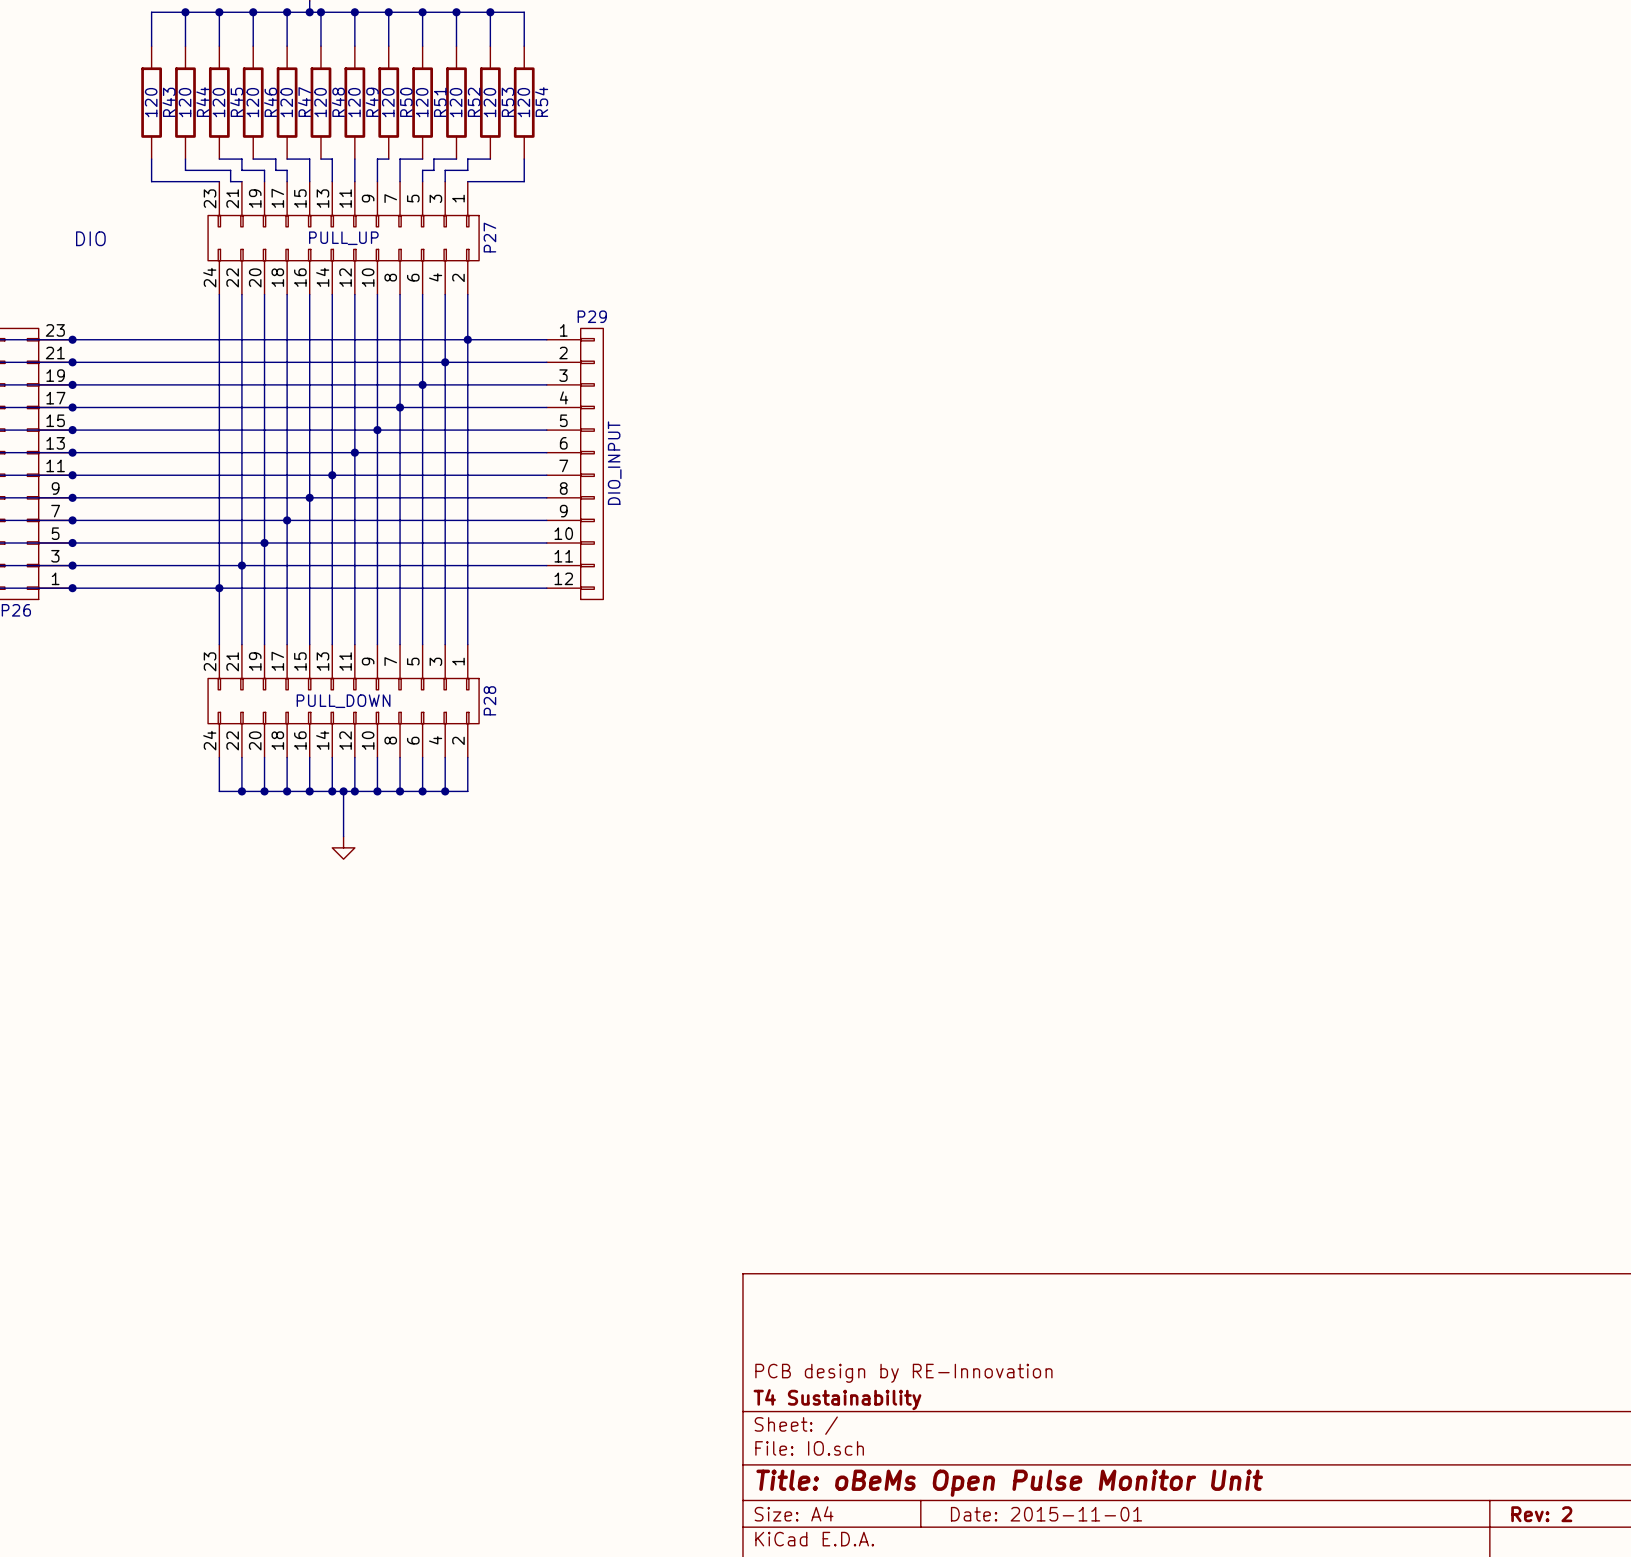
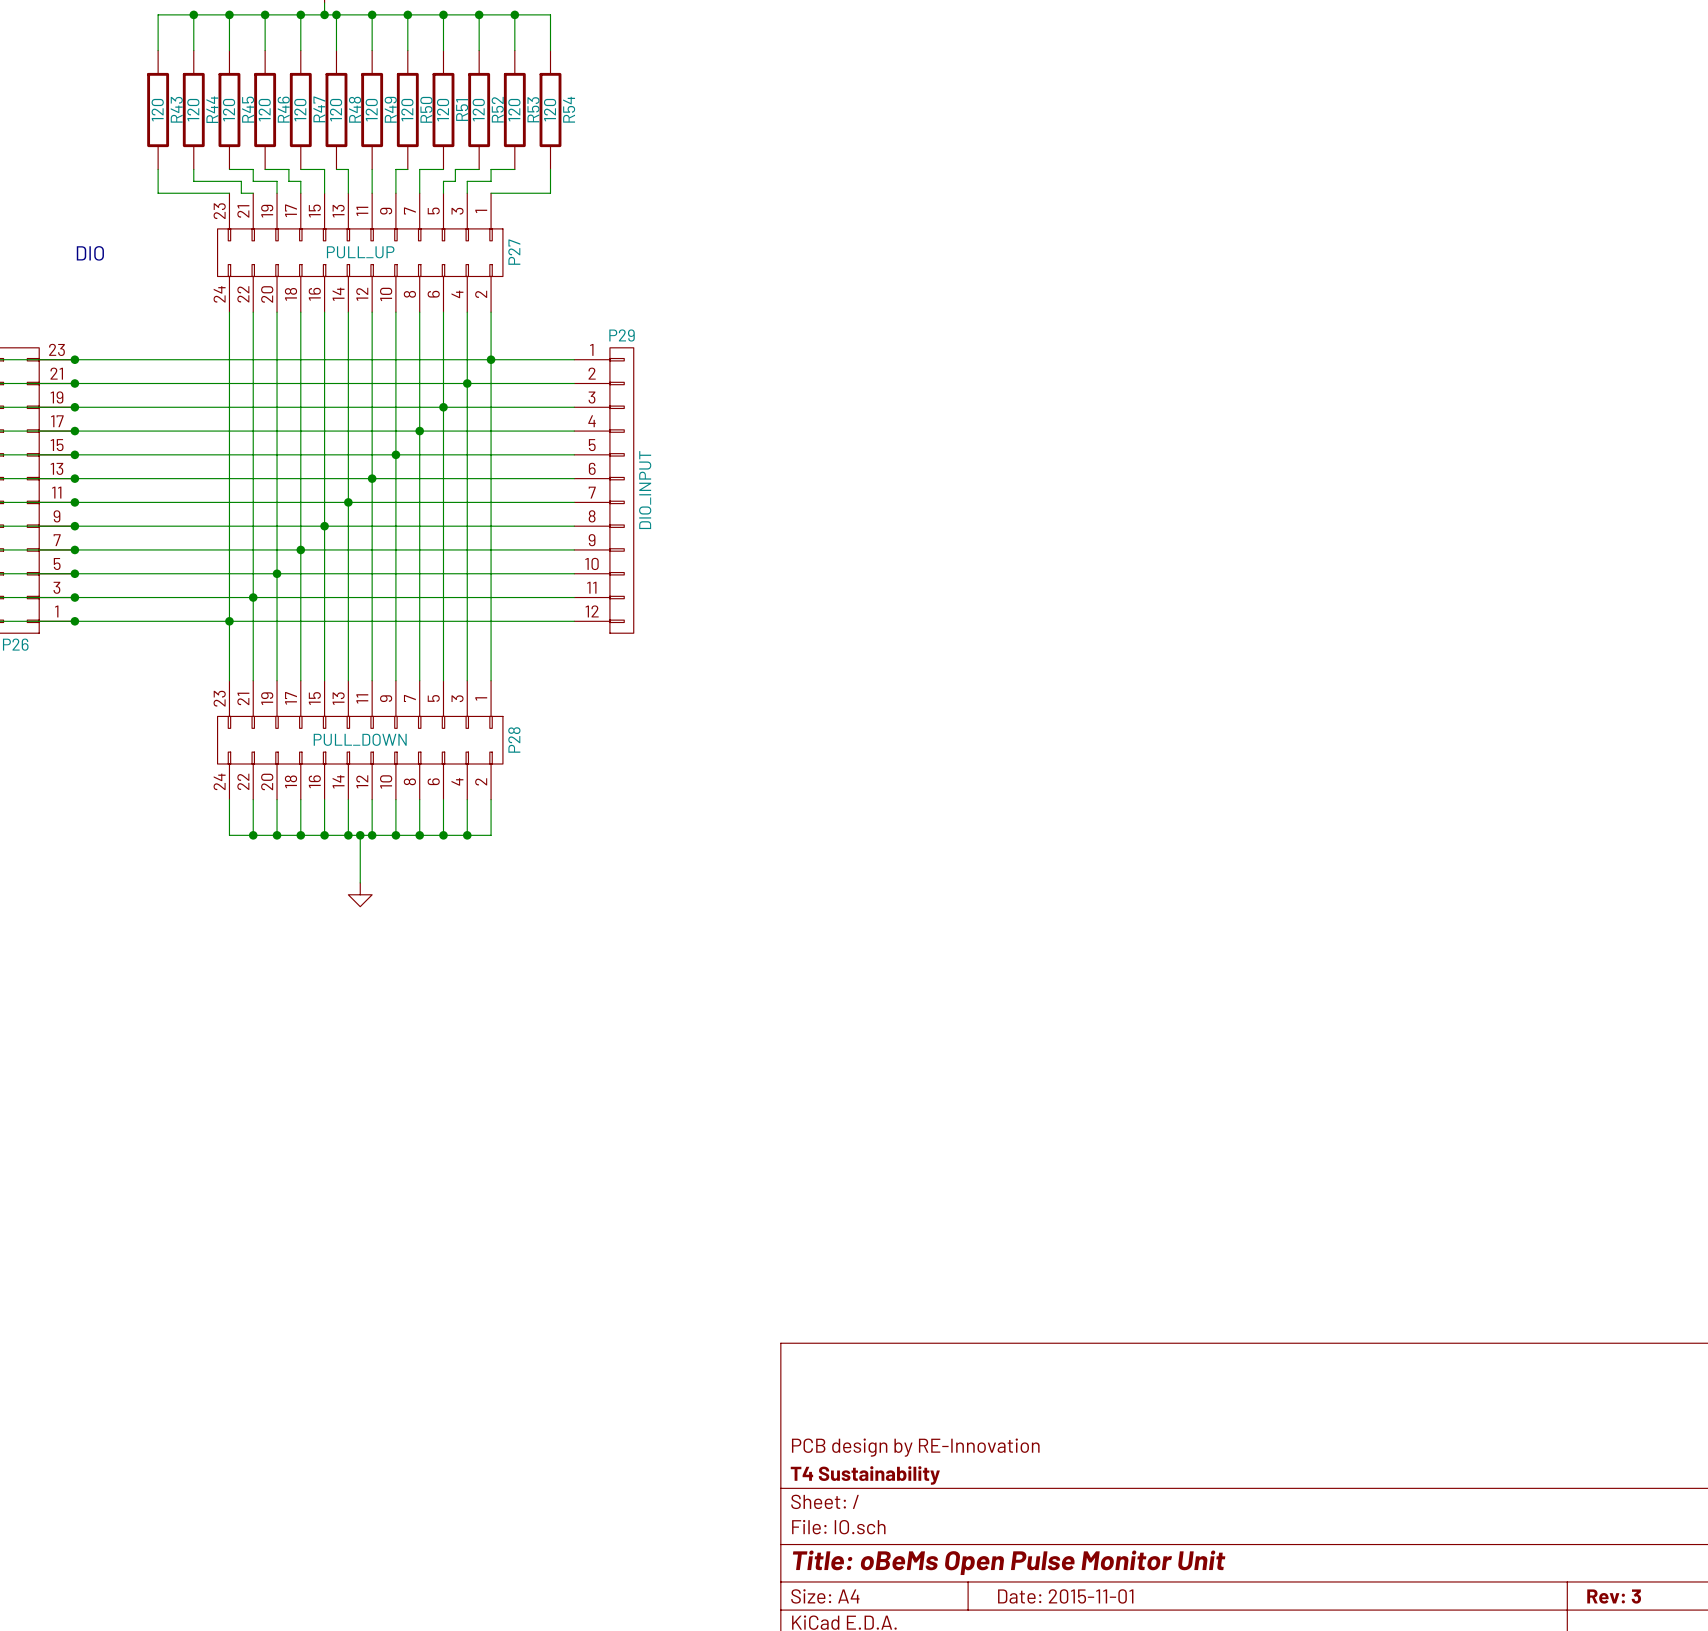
title block: Rev: 2 (1541, 1514) -> Rev: 3 (1614, 1596)

